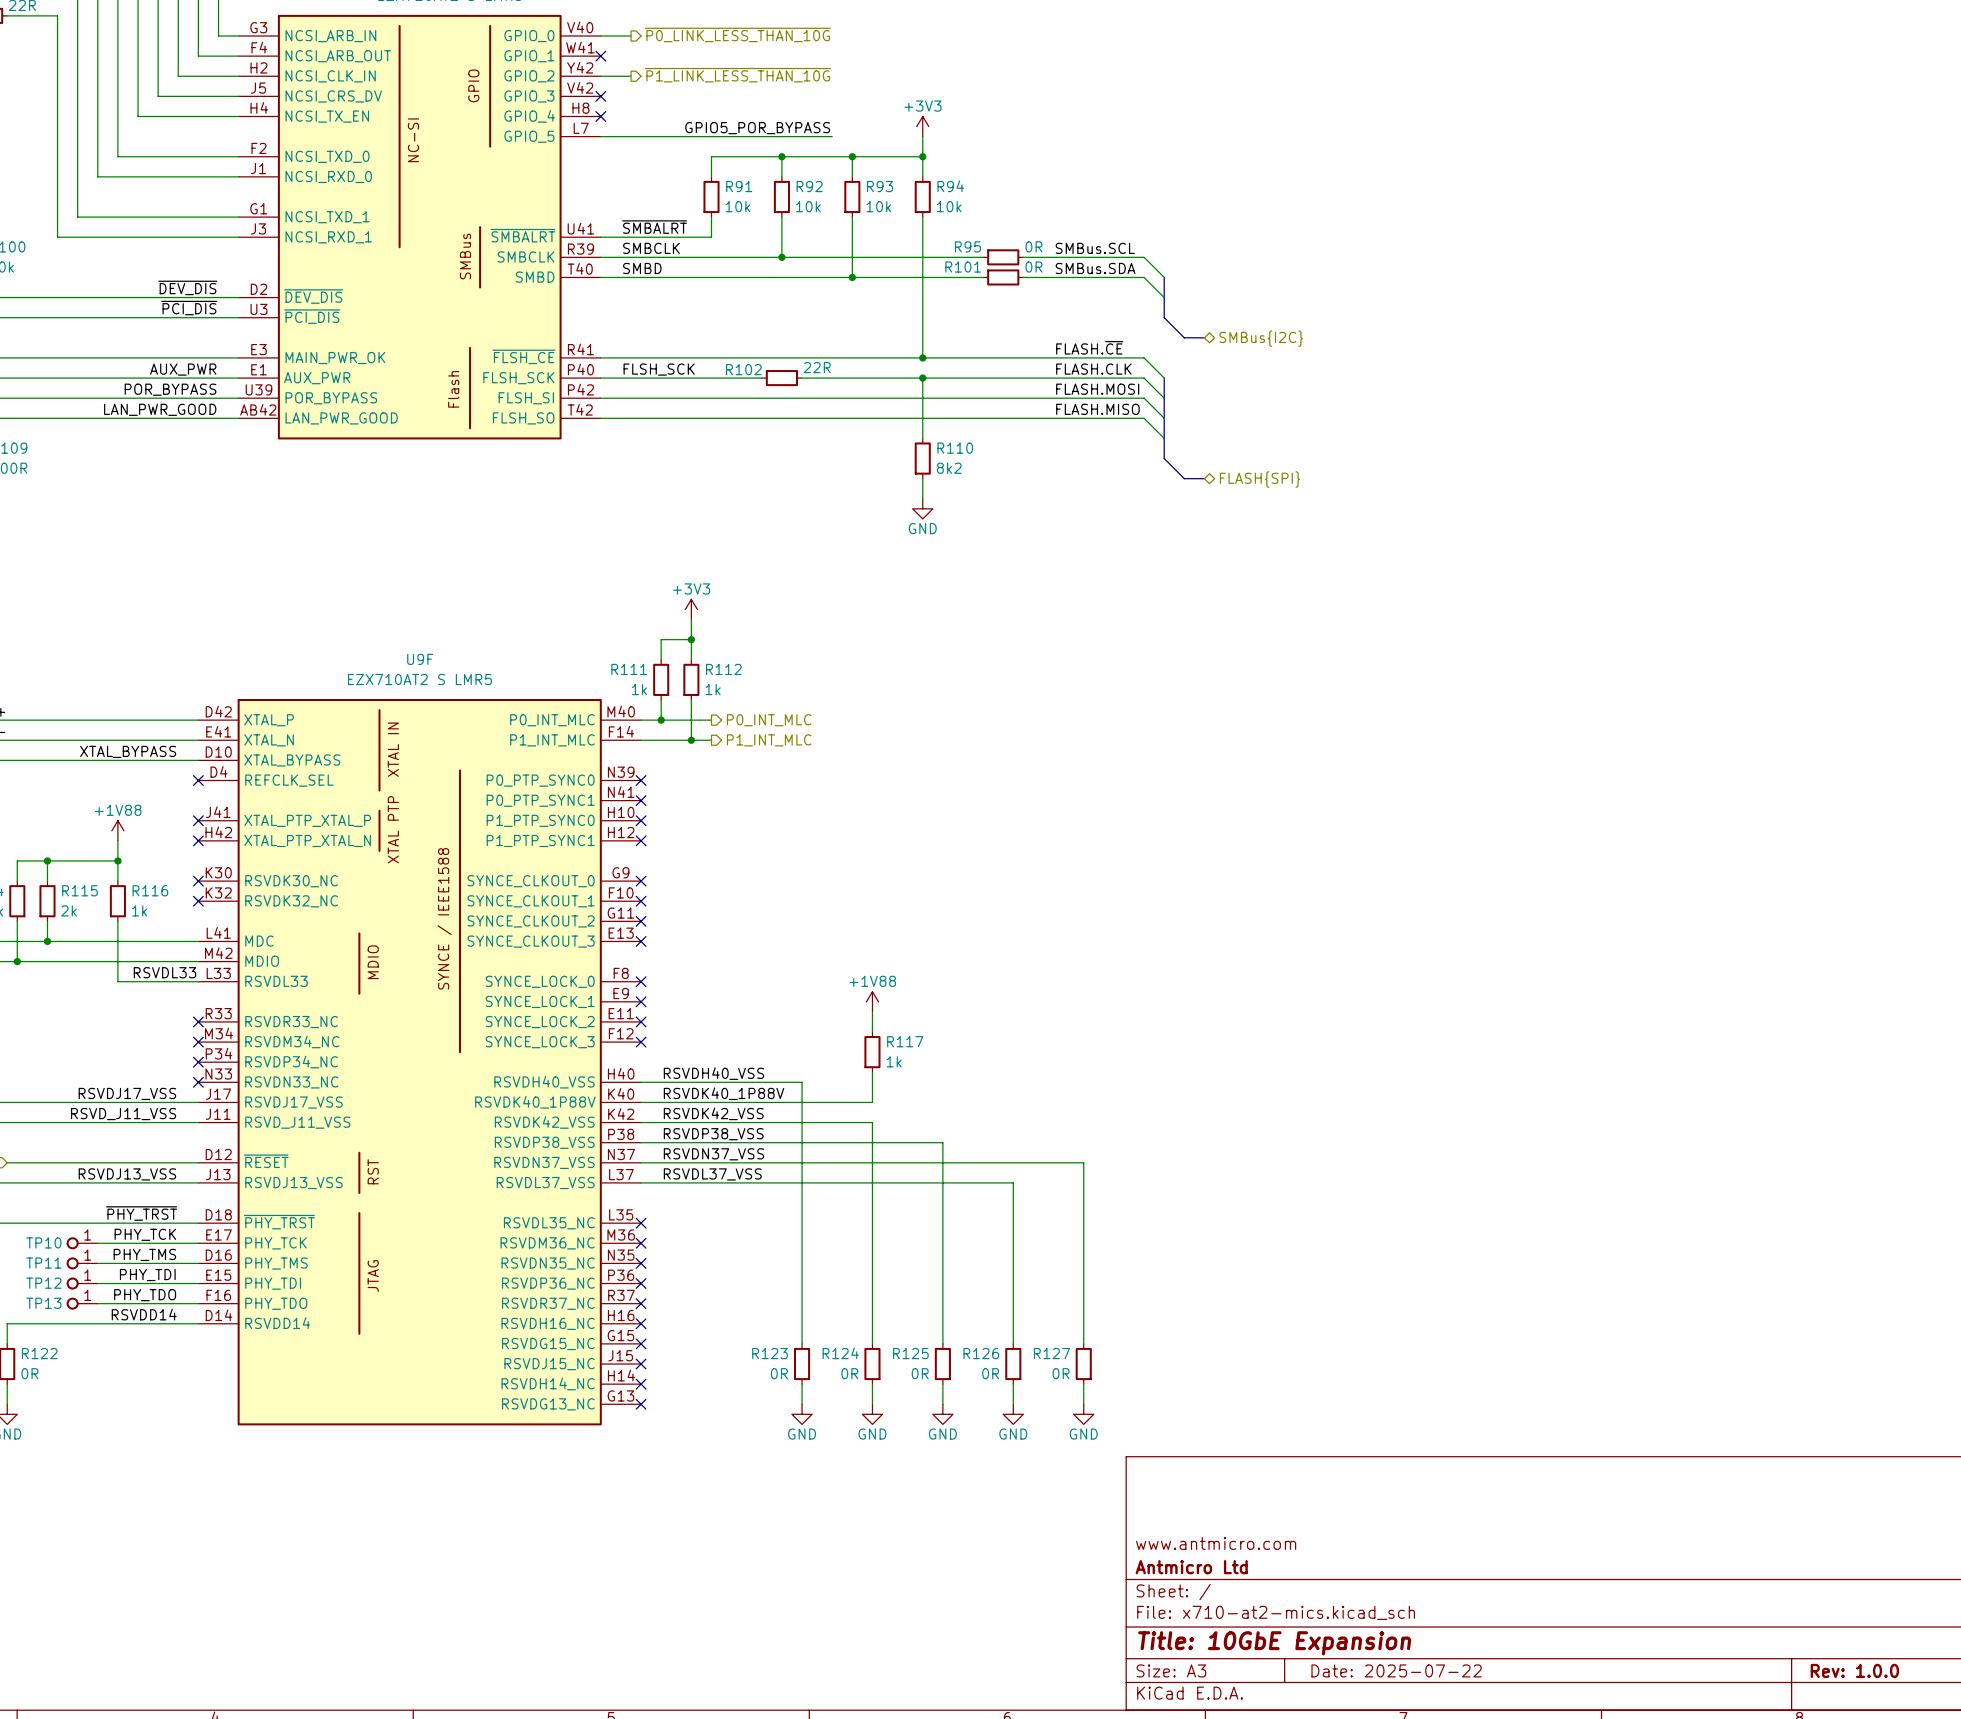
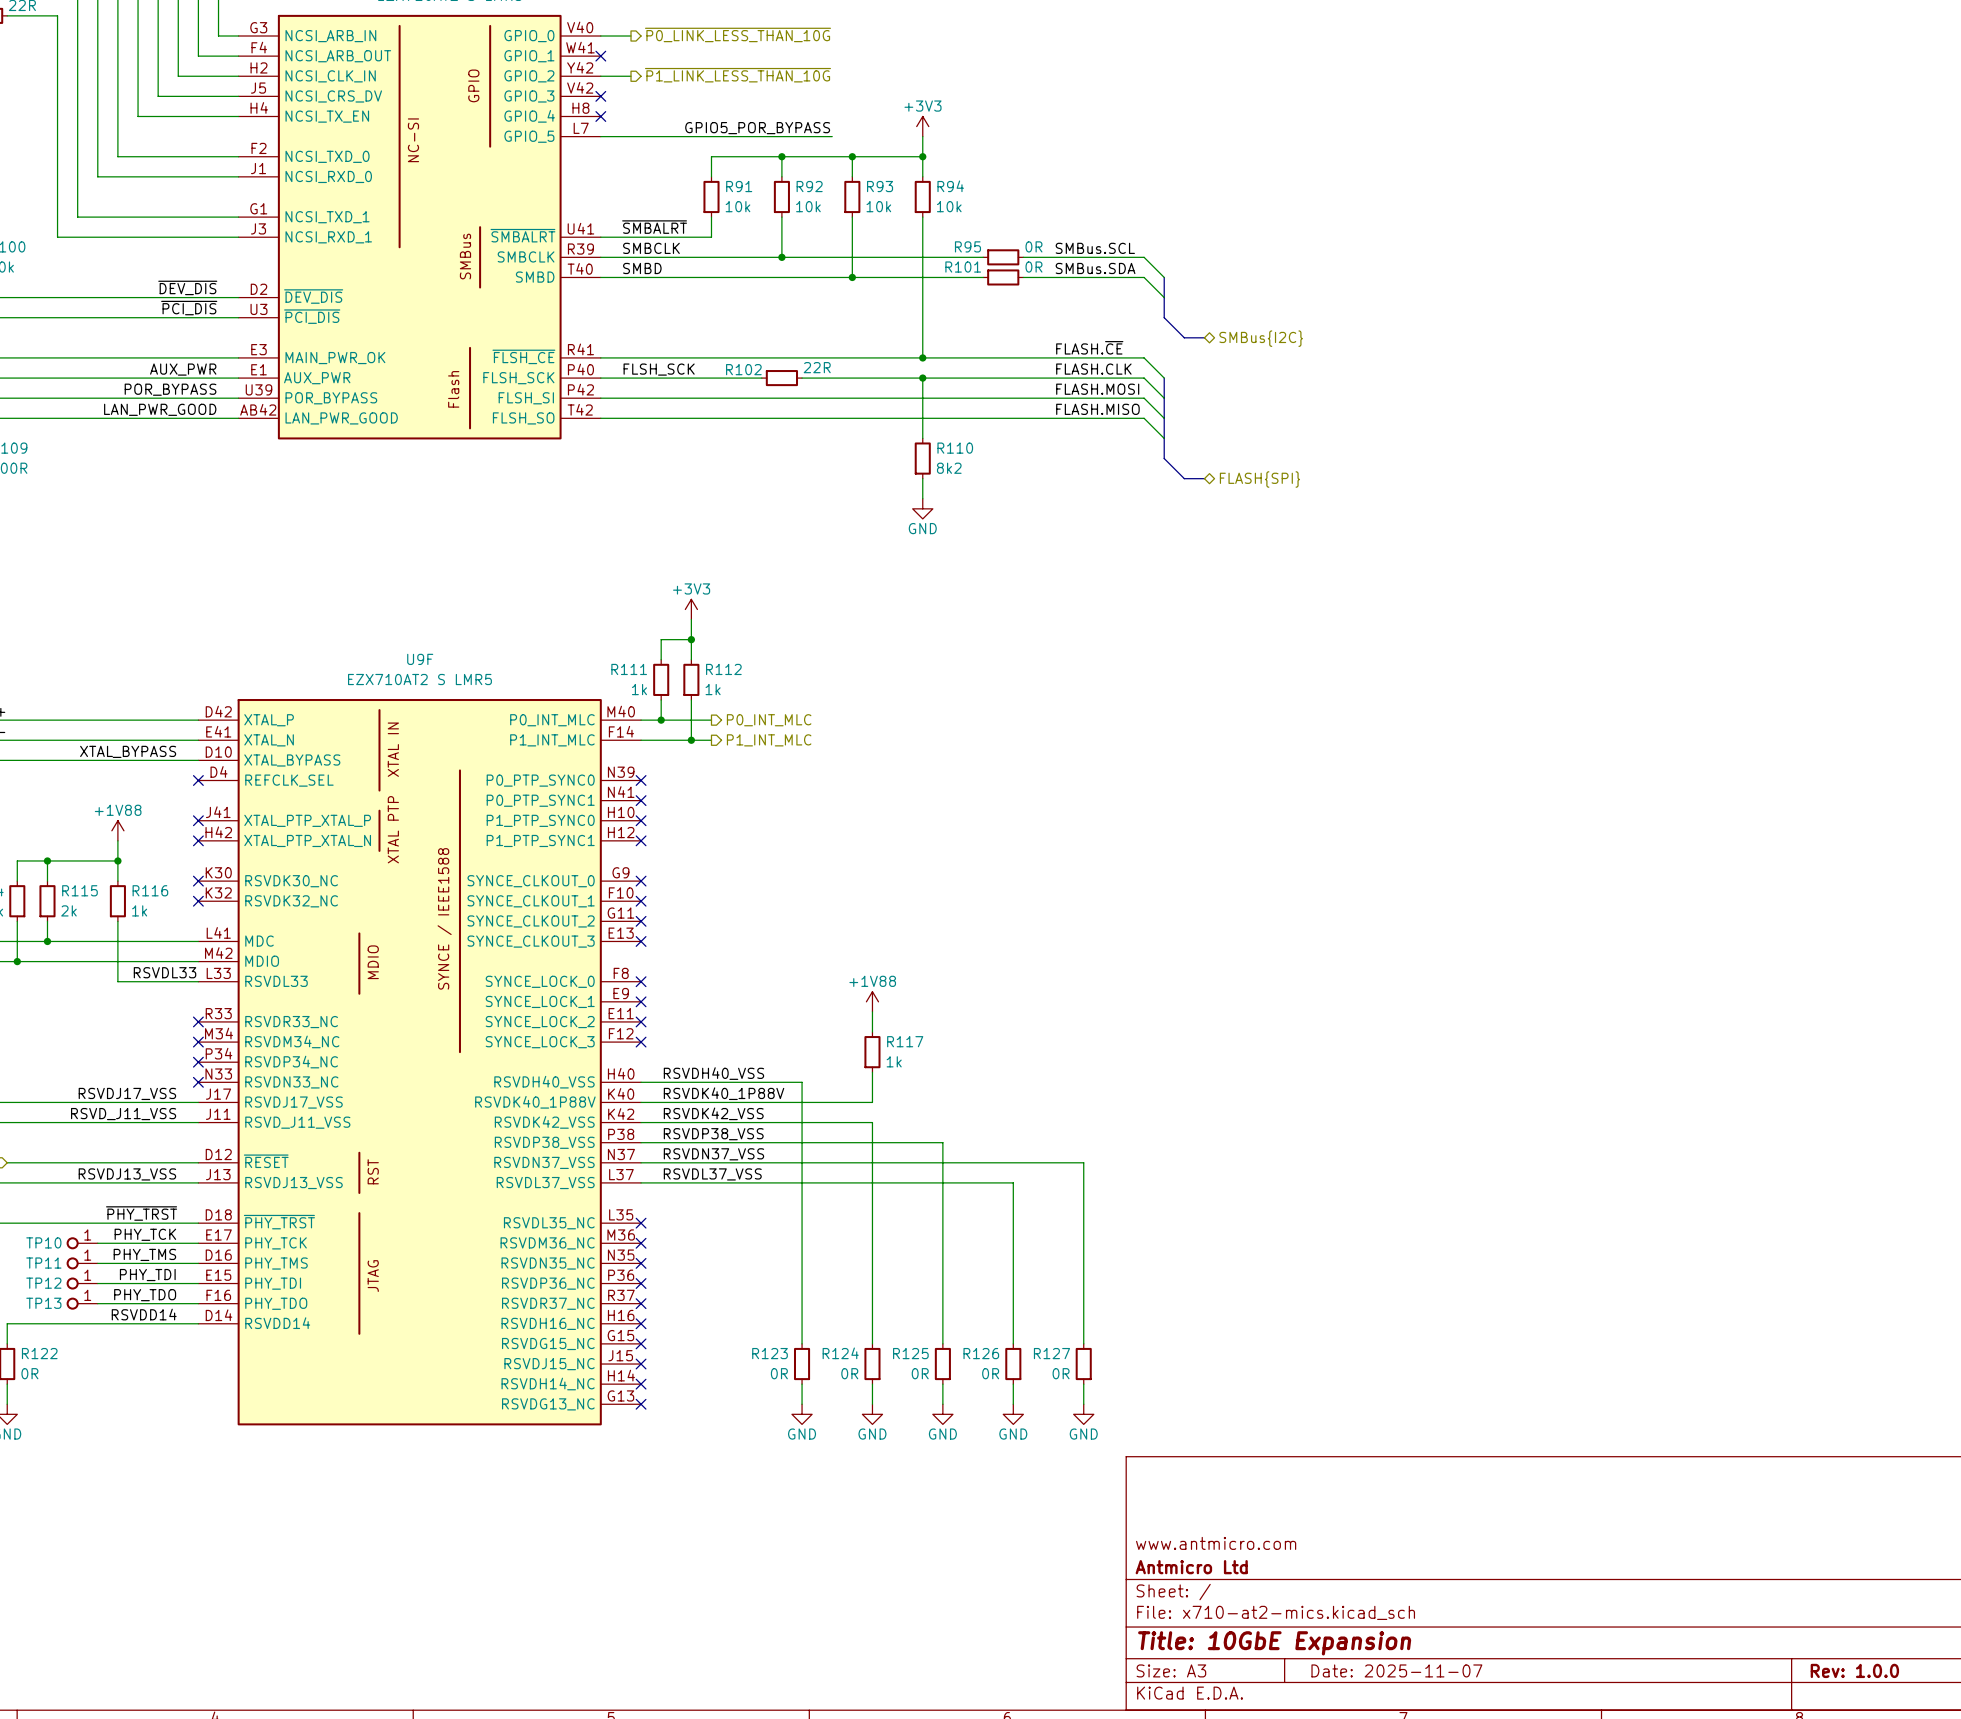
title block: Date: 2025-07-22 (1396, 1670) -> Date: 2025-11-07 (1396, 1670)

